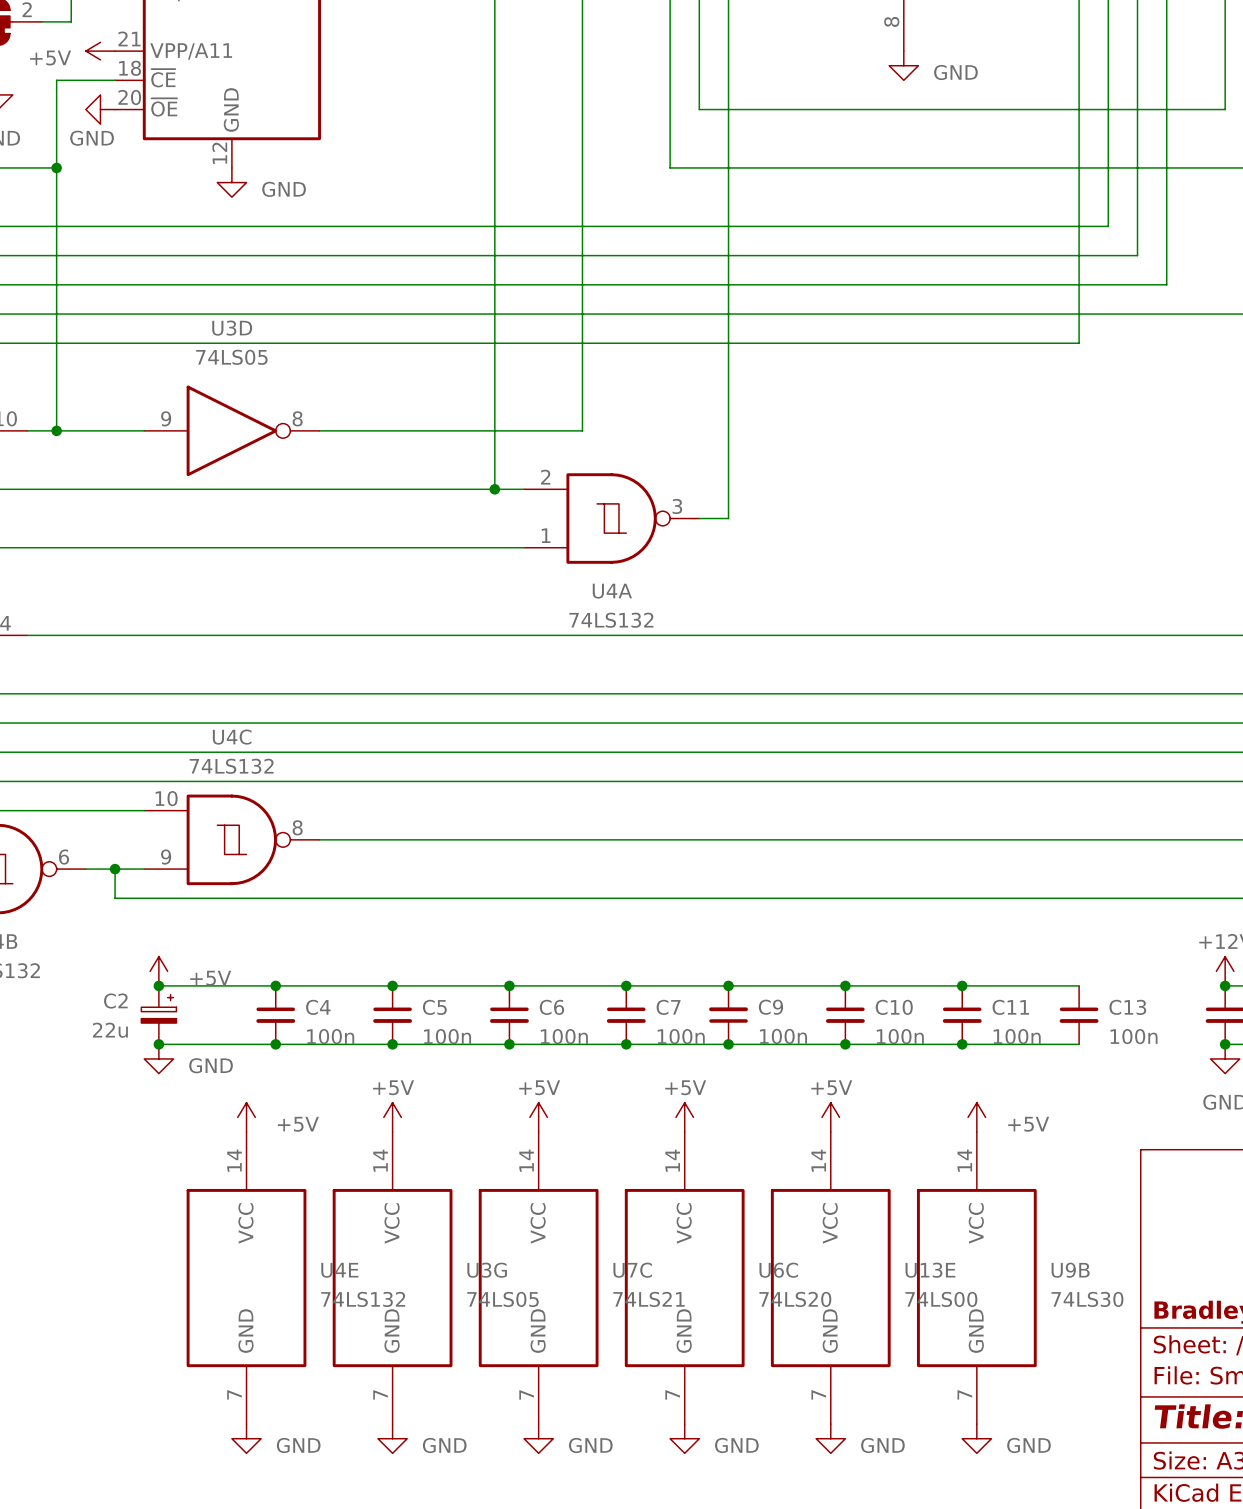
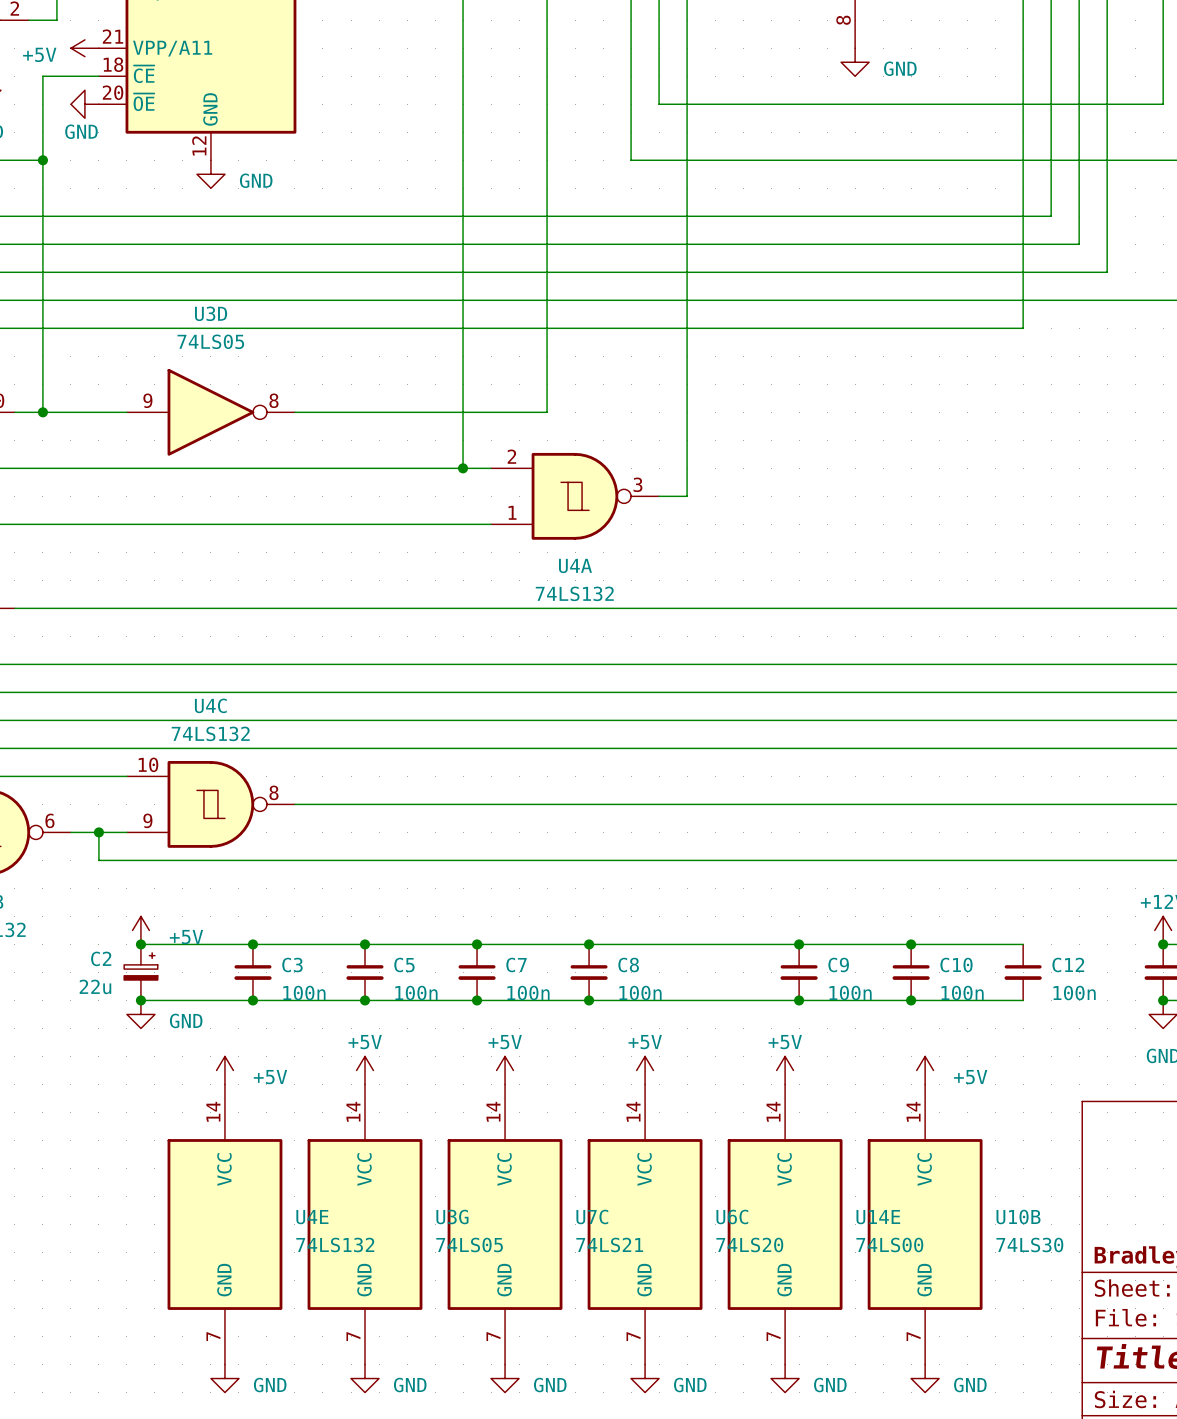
junction: (728, 985) -> none
C4 name: C4 (318, 1007) -> C3 (292, 965)
C6 name: C6 (551, 1007) -> C7 (516, 965)
C7 name: C7 (668, 1007) -> C8 (628, 965)
C10 name: C10 (894, 1007) -> C9 (838, 965)
C11 name: C11 (1010, 1007) -> C10 (956, 965)
C13 name: C13 (1127, 1007) -> C12 (1068, 965)
C9: 100n (728, 1015) -> none
junction: (728, 1044) -> none
U13E name: U13E (930, 1270) -> U14E (878, 1217)
U9B name: U9B (1070, 1270) -> U10B (1018, 1216)

